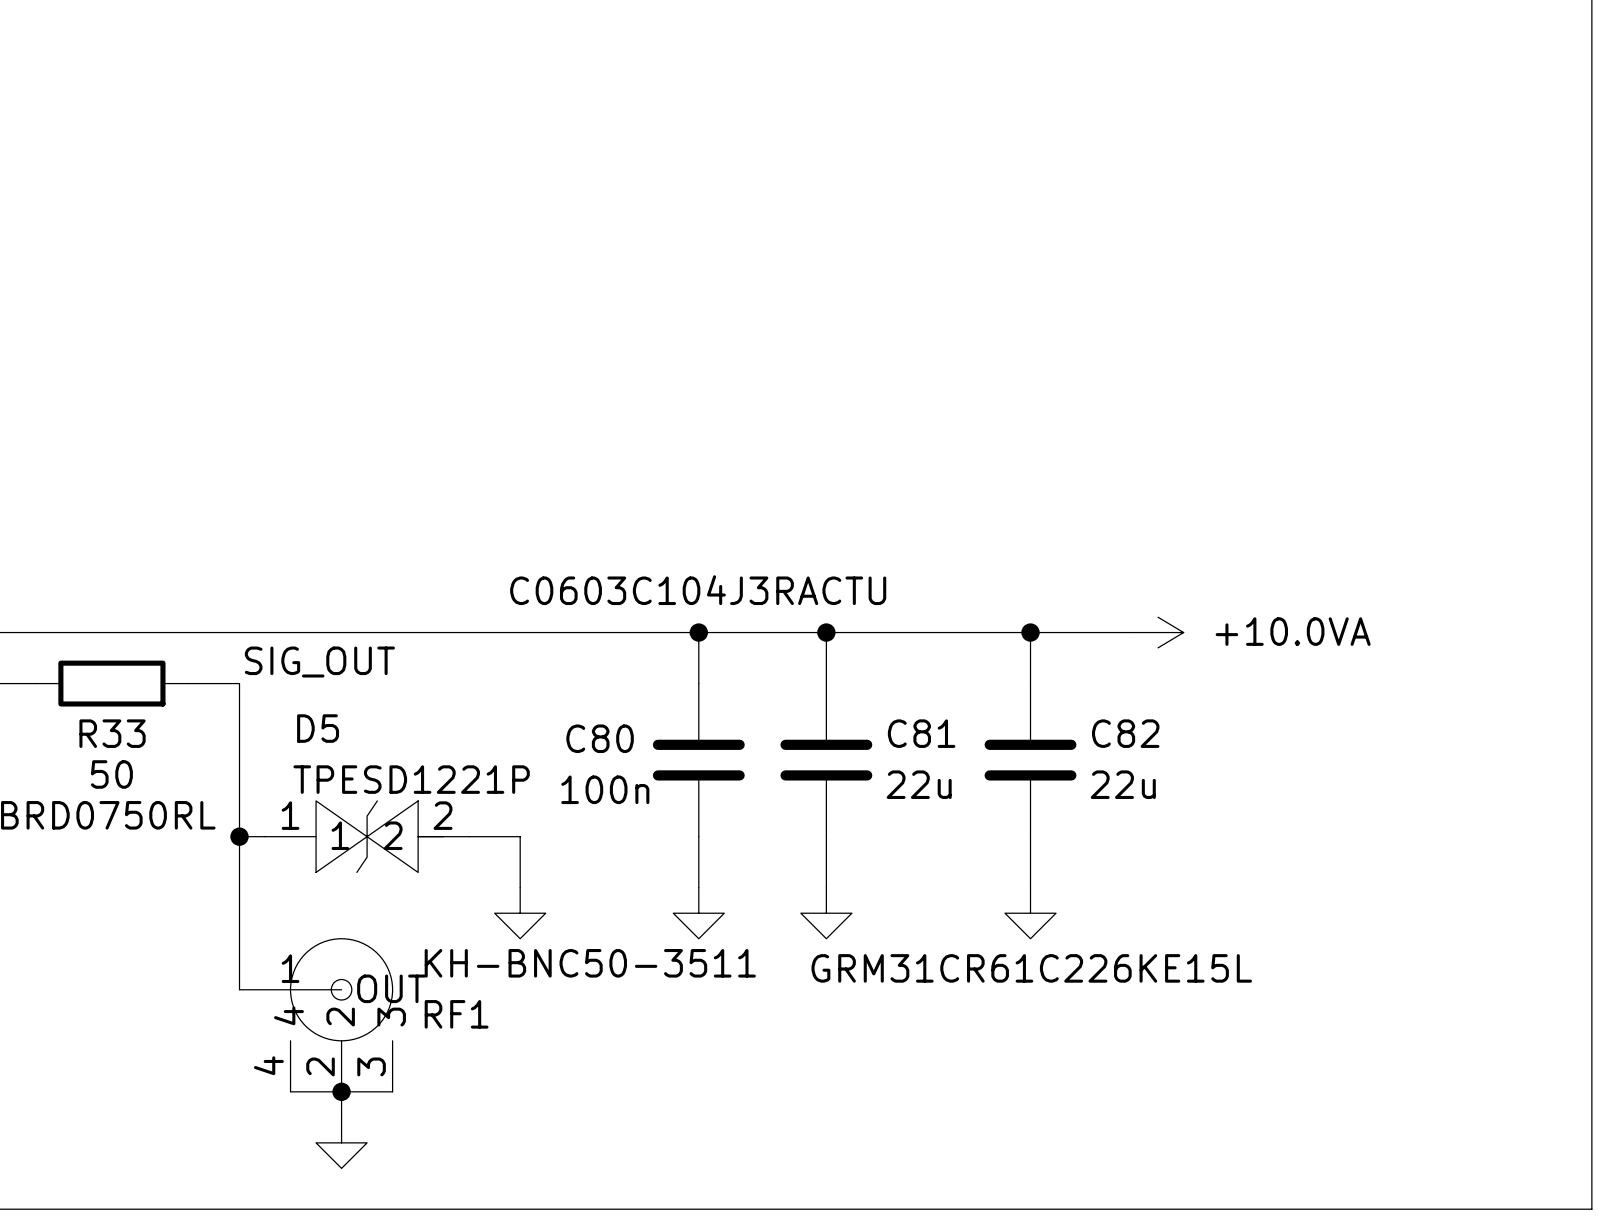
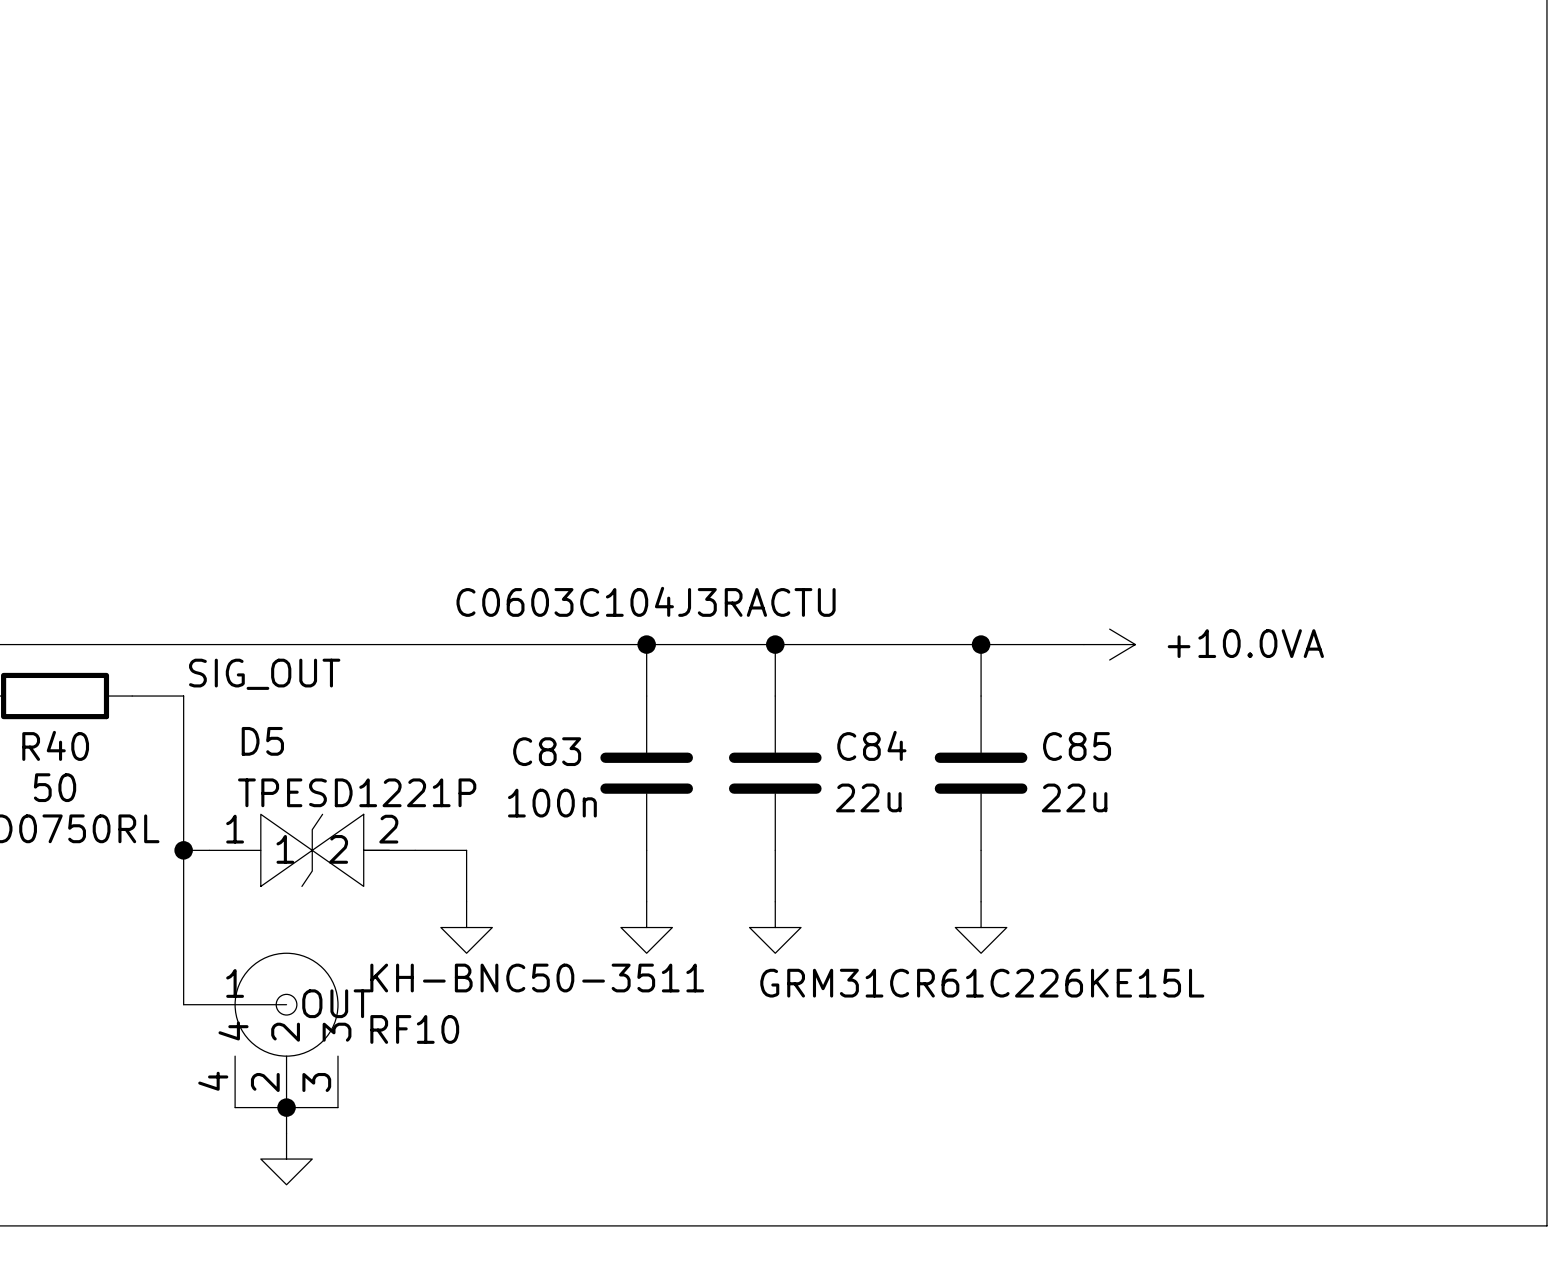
R33 name: R33 (112, 733) -> R40 (55, 745)
C81 name: C81 (921, 733) -> C84 (871, 745)
C82 name: C82 (1125, 733) -> C85 (1077, 746)
C80 name: C80 (600, 738) -> C83 (547, 751)
RF1 name: RF1 (456, 1014) -> RF10 (414, 1029)

